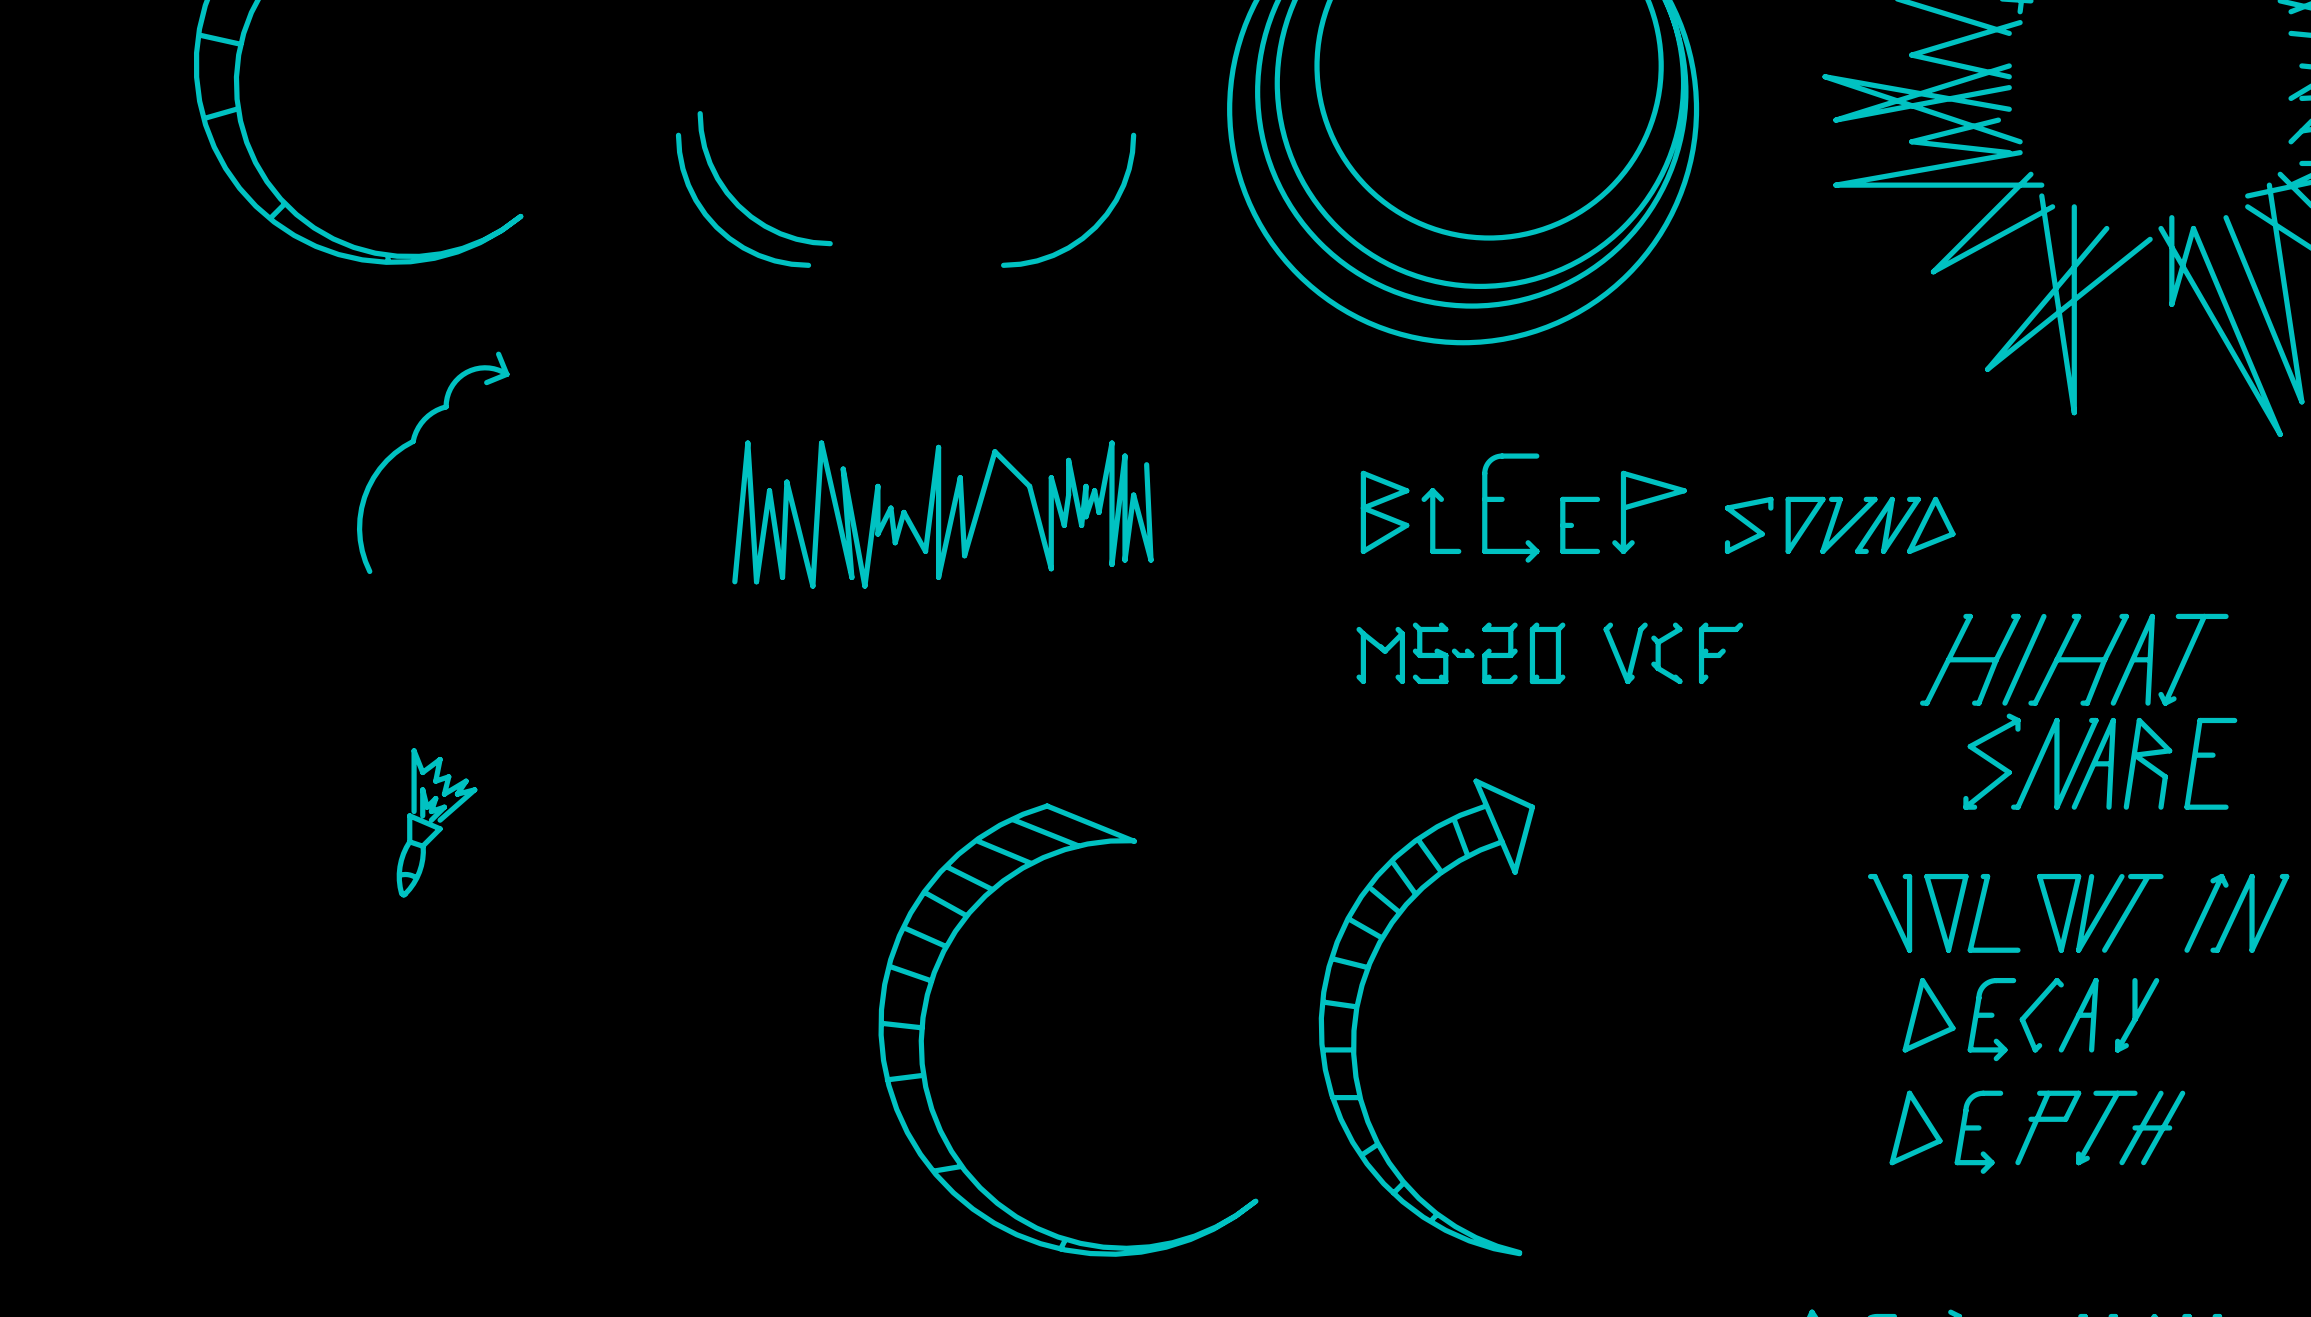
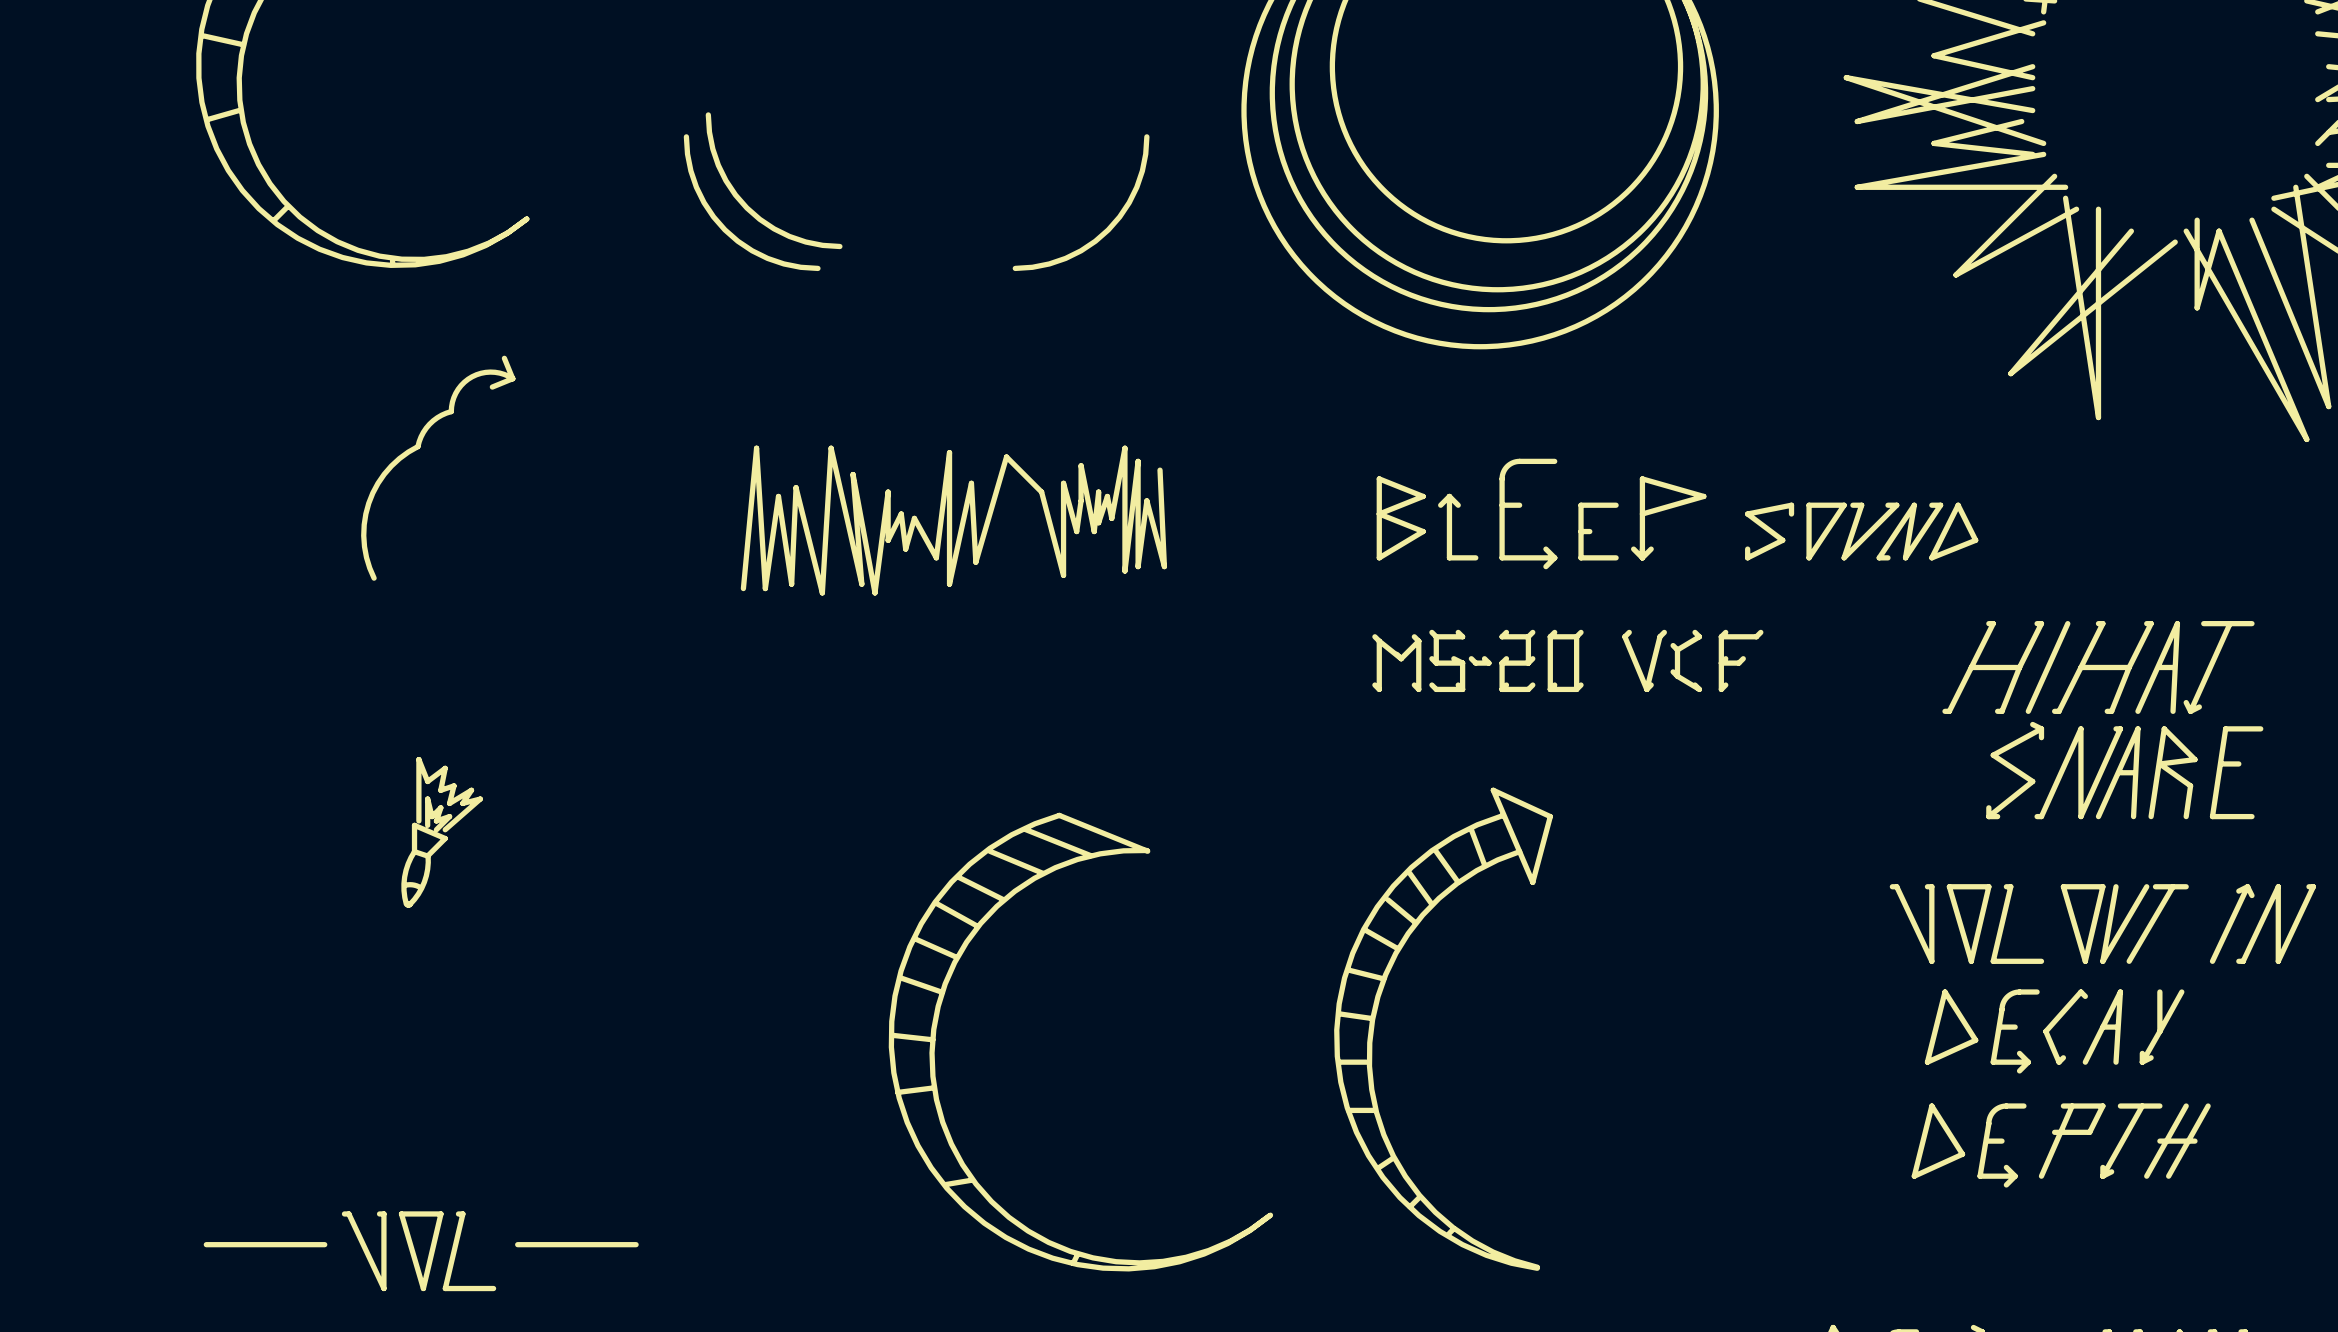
line: none -> (344, 1213) (348, 1213) (383, 1288) (383, 1213) (379, 1213)
line: none -> (401, 1213) (423, 1288) (440, 1213) (401, 1213)
line: none -> (458, 1213) (462, 1213) (445, 1288) (493, 1288)
line: none -> (206, 1244) (324, 1244)
line: none -> (517, 1244) (636, 1244)

